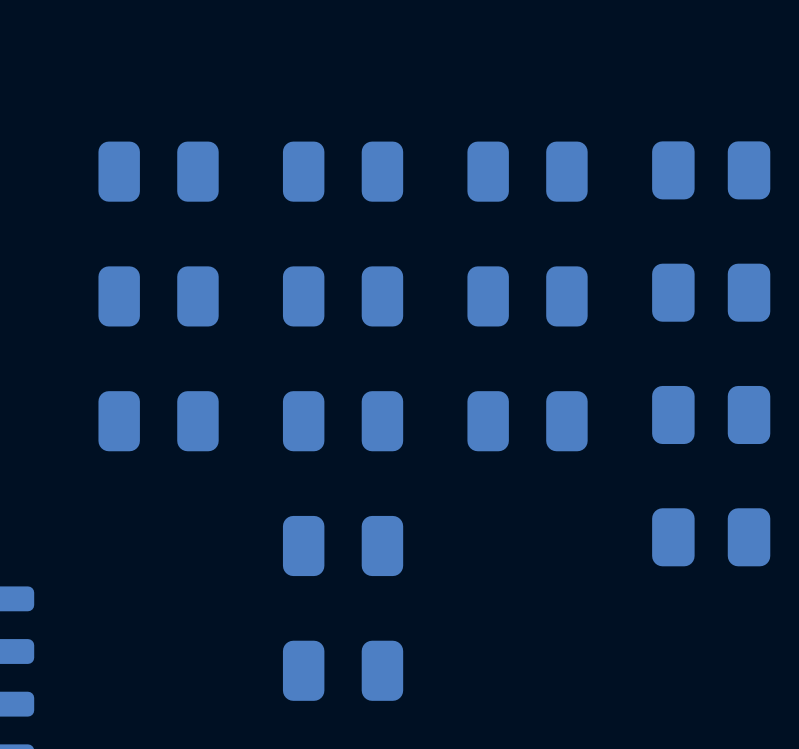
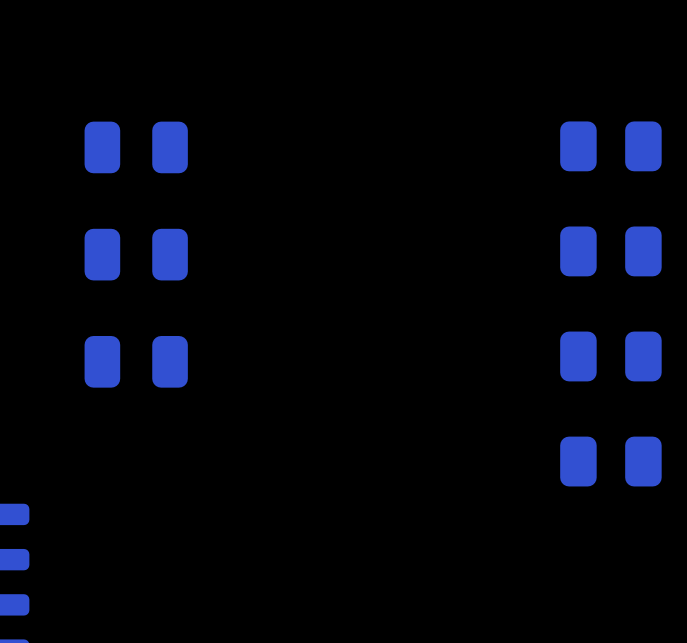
part: (343, 171) -> none
part: (527, 171) -> none
part: (343, 296) -> none
part: (527, 296) -> none
part: (343, 421) -> none
part: (527, 421) -> none
part: (343, 545) -> none
part: (343, 670) -> none

